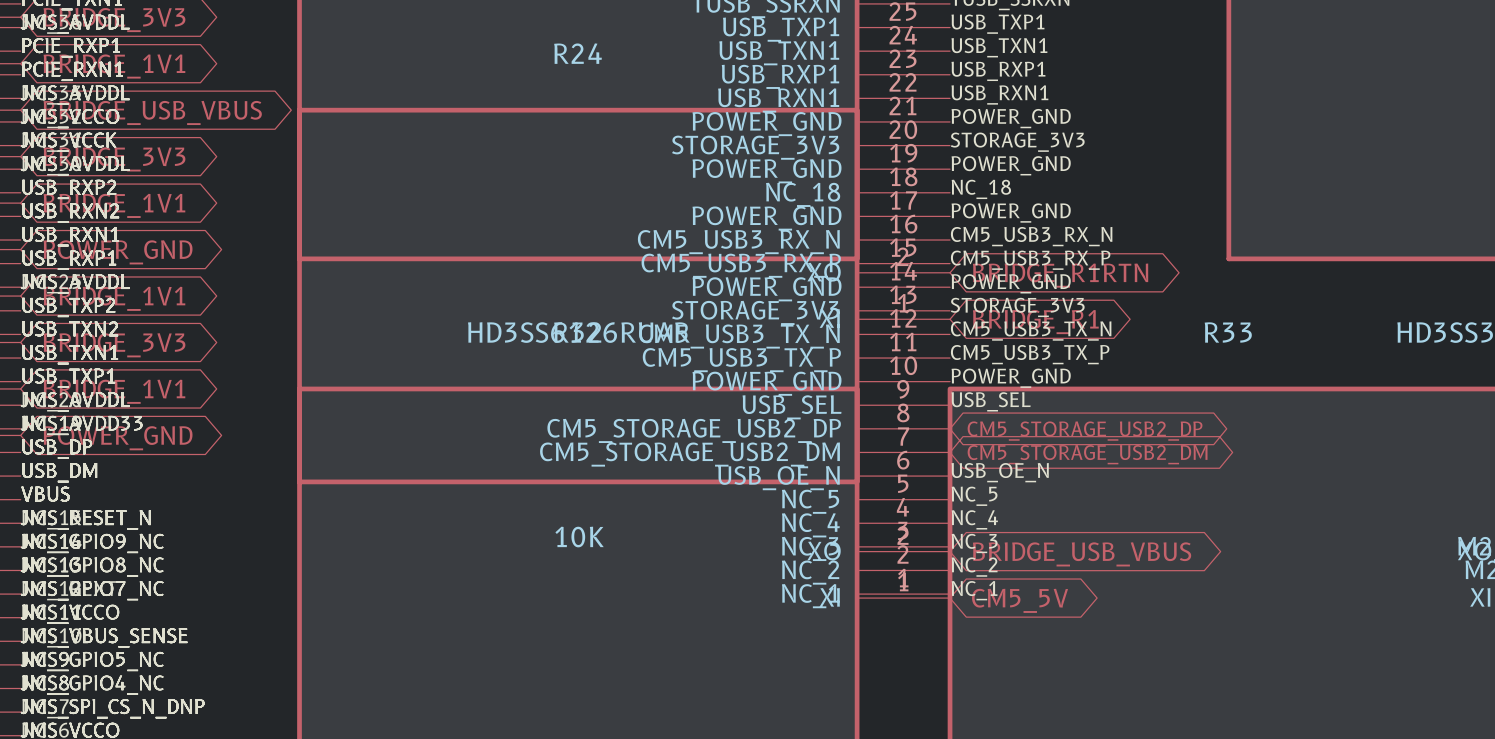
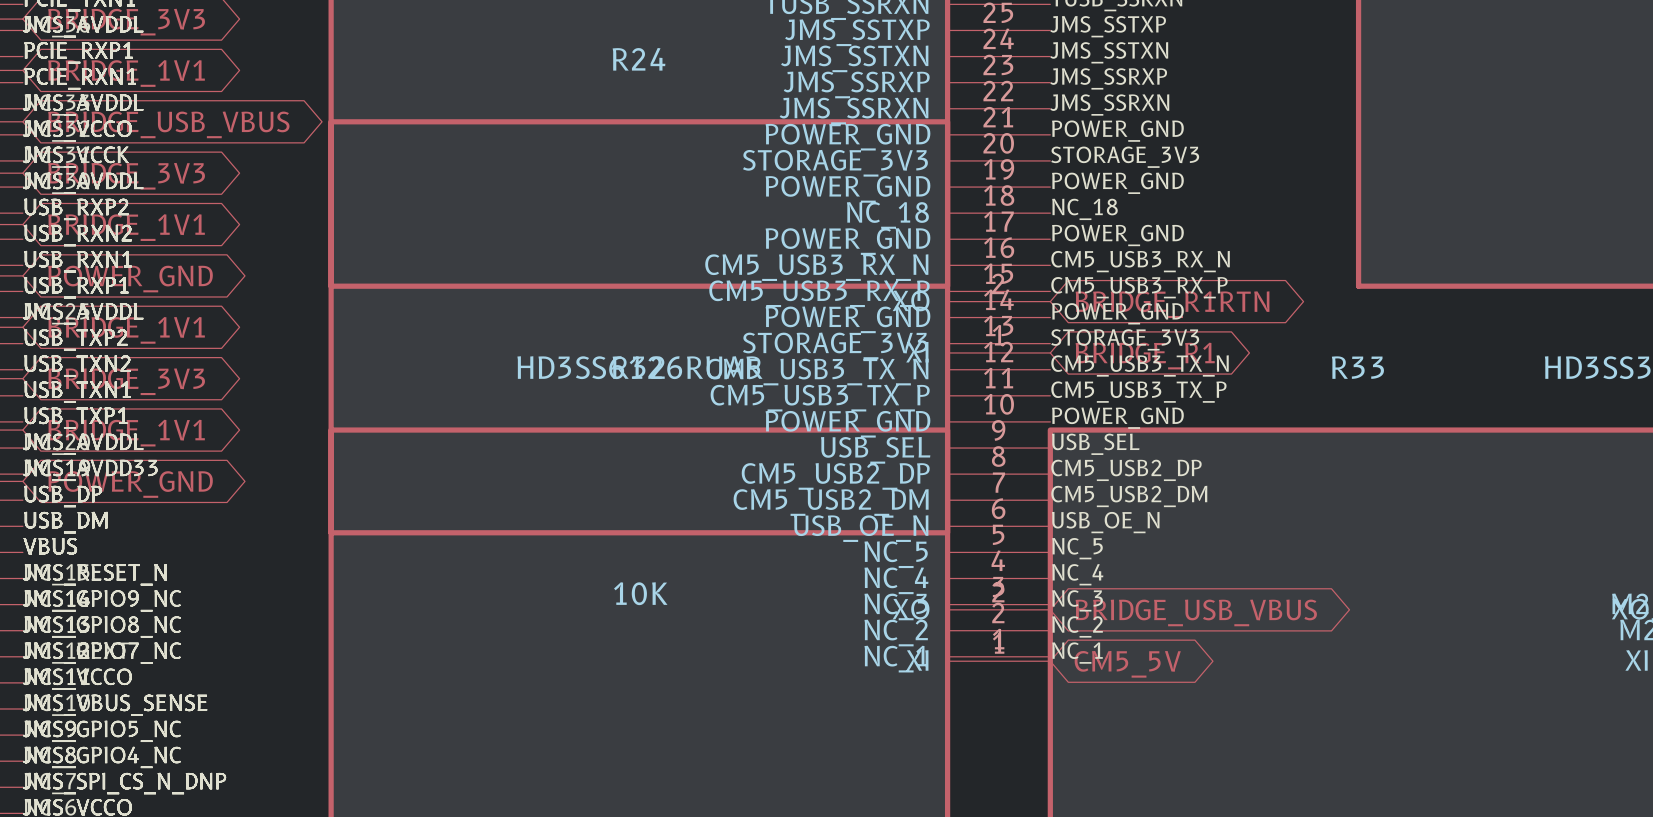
label: USB_TXP1 (997, 24) -> JMS_SSTXP (1108, 26)
part pin name: USB_TXP1 (781, 29) -> JMS_SSTXP (857, 32)
label: USB_TXN1 (999, 47) -> JMS_SSTXN (1109, 52)
part pin name: USB_TXN1 (779, 53) -> JMS_SSTXN (854, 58)
label: USB_RXP1 (998, 71) -> JMS_SSRXP (1108, 78)
part pin name: USB_RXP1 (780, 76) -> JMS_SSRXP (856, 84)
label: USB_RXN1 (999, 94) -> JMS_SSRXN (1109, 105)
part pin name: USB_RXN1 (778, 100) -> JMS_SSRXN (854, 111)
label: none -> CM5_USB2_DP (1126, 470)
part pin name: CM5_STORAGE_USB2_DP (694, 430) -> CM5_USB2_DP (835, 476)
global label: CM5_STORAGE_USB2_DP (1085, 431) -> none
label: none -> CM5_USB2_DM (1129, 496)
part pin name: CM5_STORAGE_USB2_DM (689, 454) -> CM5_USB2_DM (831, 502)
global label: CM5_STORAGE_USB2_DM (1087, 454) -> none

